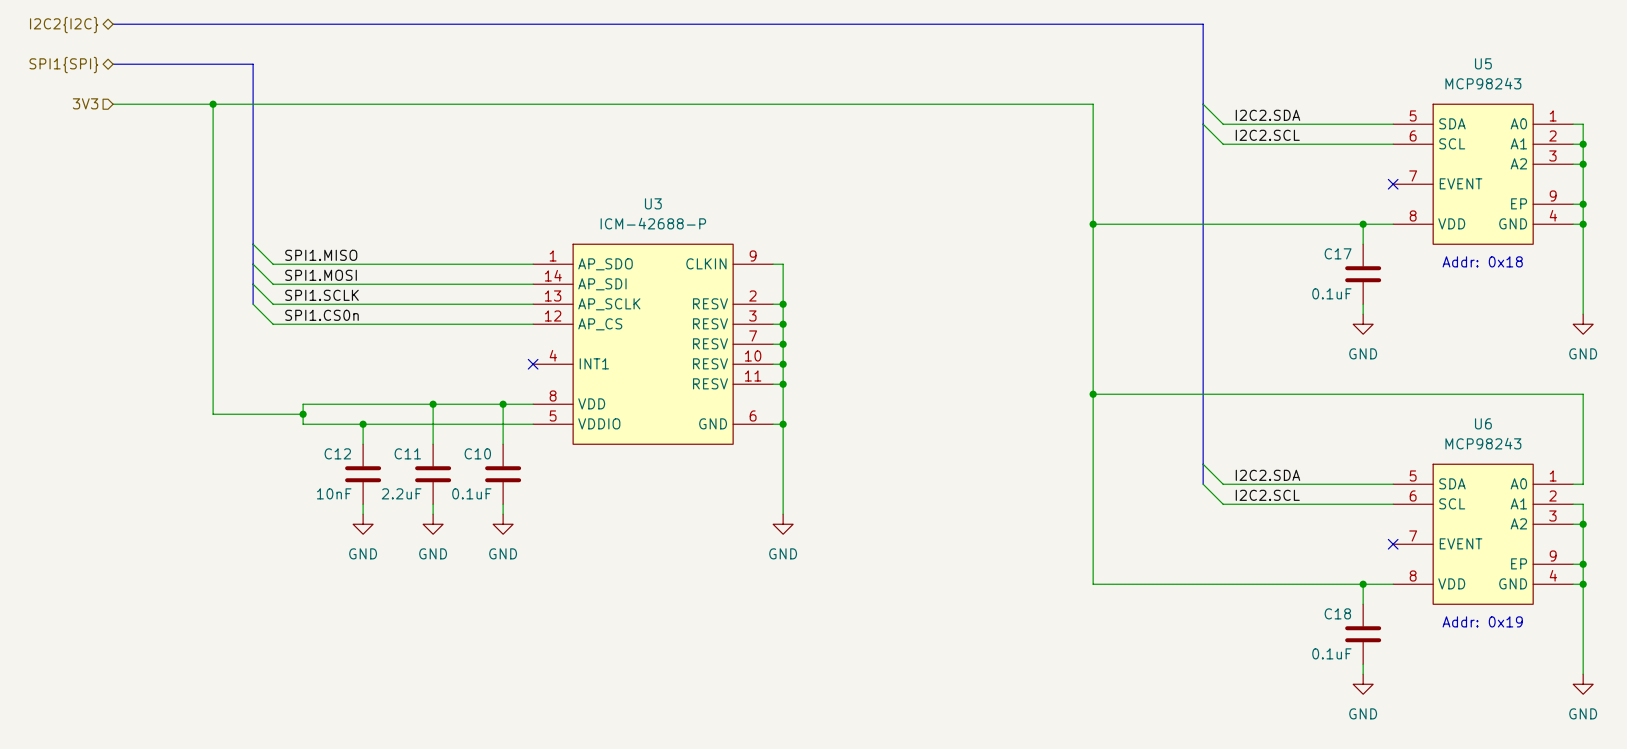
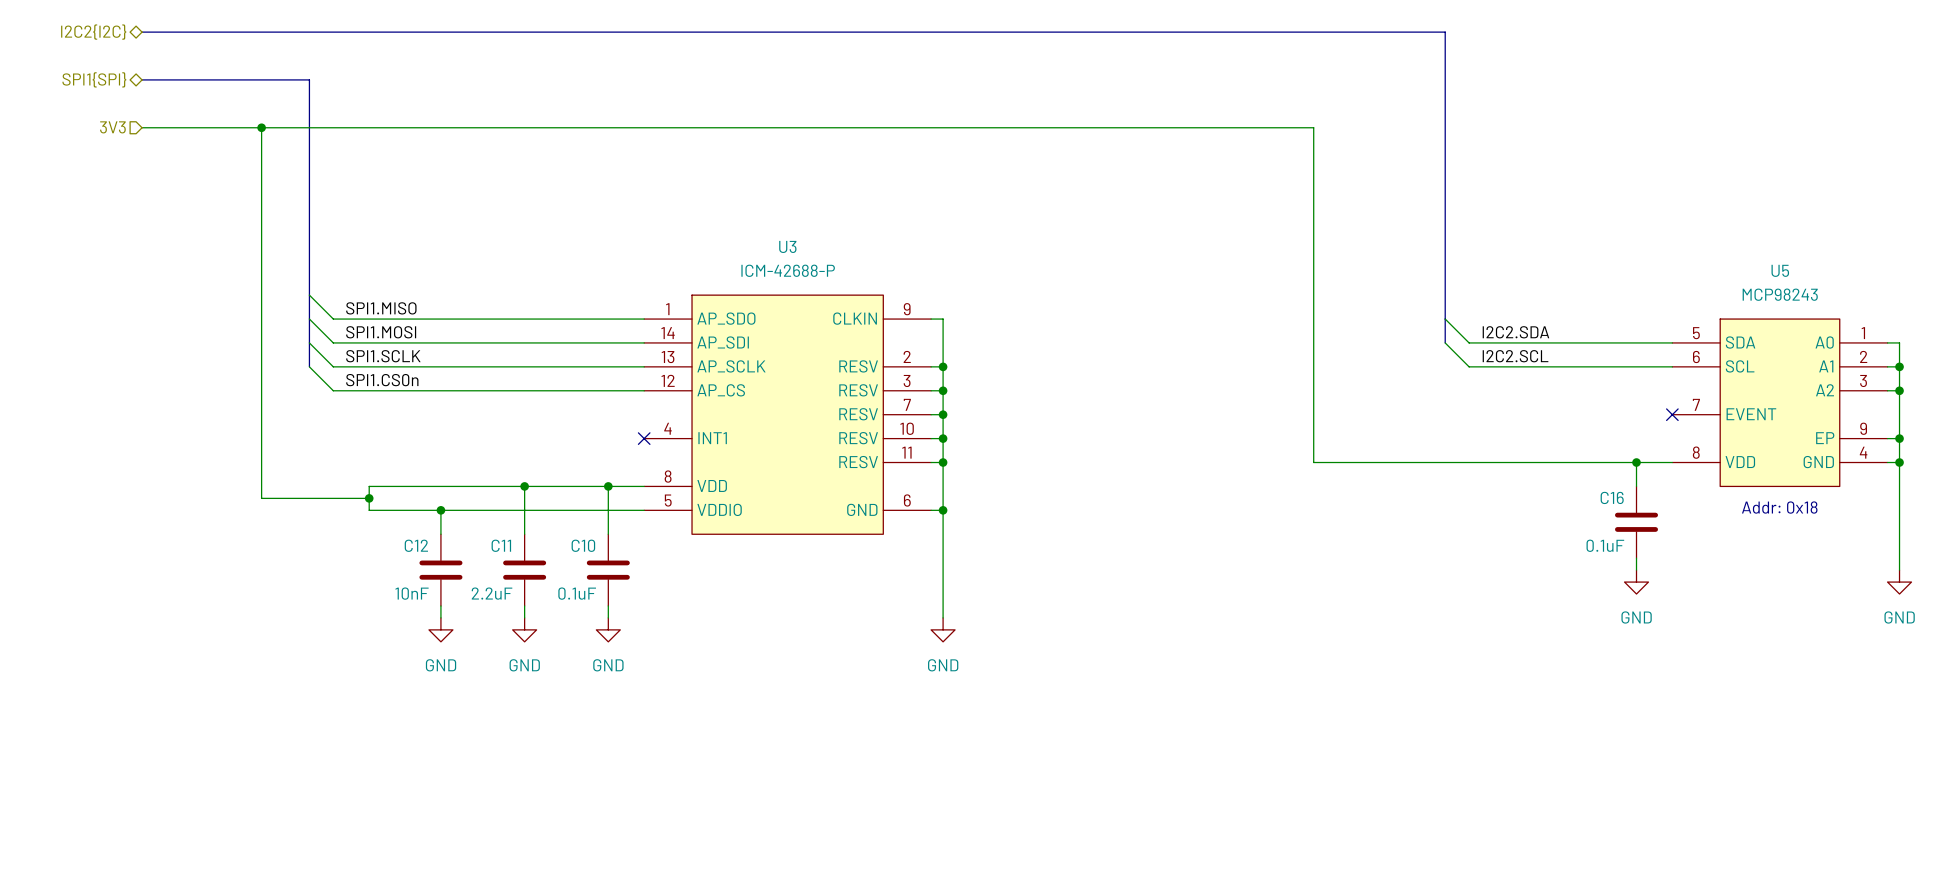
wire: (1203, 104) (1223, 124) (1393, 124) -> (1445, 319) (1469, 342) (1672, 342)
label: I2C2.SDA (1267, 115) -> none
wire: (1203, 124) (1223, 144) (1393, 144) -> (1445, 342) (1469, 366) (1672, 366)
wire: (1573, 124) (1583, 124) (1583, 284) -> (1887, 342) (1899, 342)
label: I2C2.SCL (1267, 135) -> none
wire: (1573, 144) (1583, 144) -> (1887, 366) (1899, 366)
junction: (1583, 144) -> none
junction: (1583, 164) -> none
U5 position: (1483, 174) -> (1779, 402)
no-connect mark: (1393, 184) -> none
wire: (1573, 204) (1583, 204) -> (1887, 438) (1899, 438)
junction: (1583, 204) -> none
wire: (1093, 224) (1393, 224) -> none
junction: (1093, 224) -> none
wire: (1363, 224) (1363, 244) -> (1636, 462) (1636, 486)
junction: (1363, 224) -> none
wire: (1573, 224) (1583, 224) -> (1887, 462) (1899, 462)
junction: (1583, 224) -> none
text position: Addr: 0x18 (1482, 261) -> Addr: 0x18 (1779, 507)
C17: 0.1uF (1363, 274) -> none
label: none -> I2C2.SDA (1515, 332)
bus: (1203, 284) (1203, 484) -> none
label: none -> I2C2.SCL (1515, 356)
wire: (1363, 304) (1363, 314) -> (1636, 558) (1636, 570)
junction: none -> (1899, 366)
power symbol: GND (1363, 324) -> none
junction: none -> (1899, 390)
power symbol: GND (1583, 324) -> none
no-connect mark: none -> (1672, 414)
junction: none -> (1899, 438)
wire: (1093, 384) (1093, 584) (1393, 584) -> (1313, 462) (1672, 462)
junction: none -> (1636, 462)
junction: none -> (1899, 462)
wire: (1093, 394) (1583, 394) -> (1899, 378) (1899, 474)
junction: (1093, 394) -> none
C16: none -> 0.1uF (1636, 522)
wire: (1203, 464) (1223, 484) (1393, 484) -> none
label: I2C2.SDA (1267, 475) -> none
wire: (1203, 484) (1223, 504) (1393, 504) -> none
power symbol: none -> GND (1636, 582)
power symbol: none -> GND (1899, 582)
label: I2C2.SCL (1267, 495) -> none
wire: (1573, 504) (1583, 504) (1583, 674) -> none
wire: (1573, 524) (1583, 524) -> none
junction: (1583, 524) -> none
U6: MCP98243 (1483, 534) -> none
no-connect mark: (1393, 544) -> none
wire: (1573, 564) (1583, 564) -> none
junction: (1583, 564) -> none
wire: (1363, 584) (1363, 604) -> none
junction: (1363, 584) -> none
wire: (1573, 584) (1583, 584) -> none
junction: (1583, 584) -> none
text: Addr: 0x19 (1482, 621) -> none
C18: 0.1uF (1363, 634) -> none
wire: (1363, 664) (1363, 674) -> none
power symbol: GND (1363, 684) -> none
power symbol: GND (1583, 684) -> none

